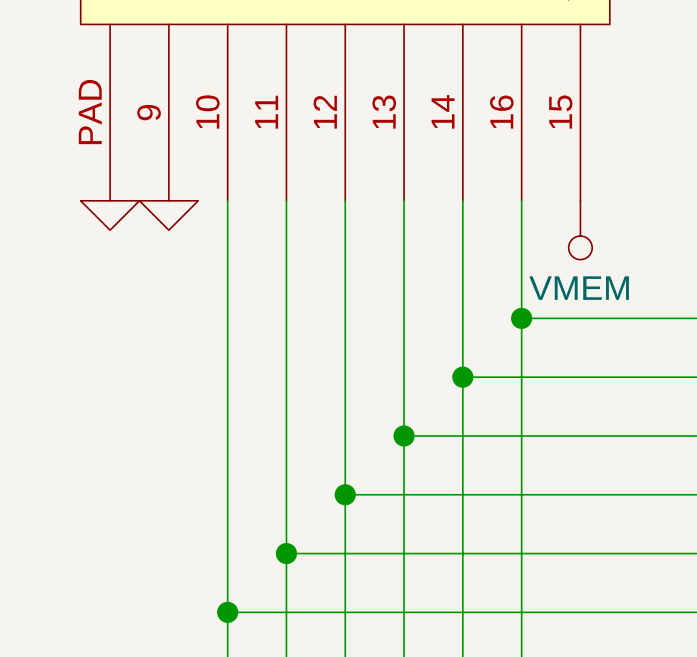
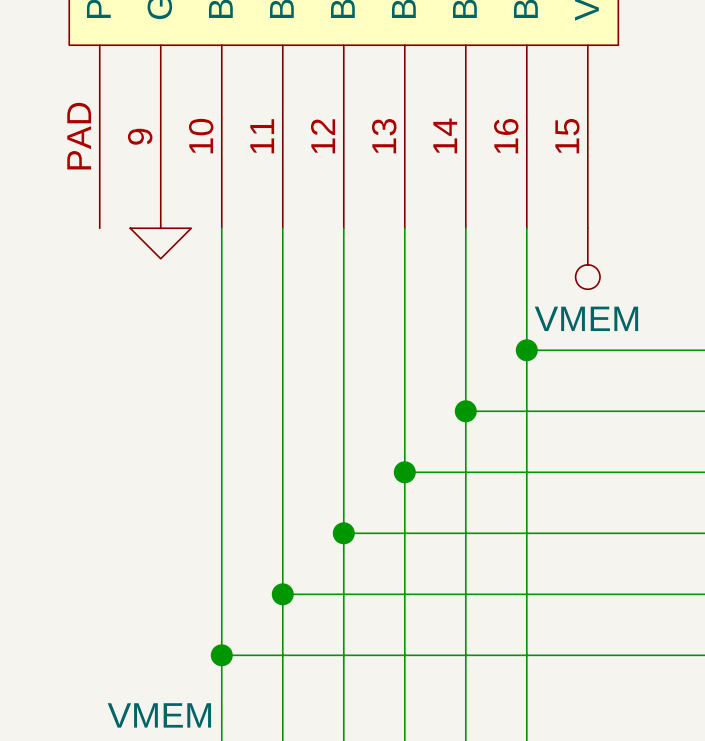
power symbol: (110, 215) -> none

